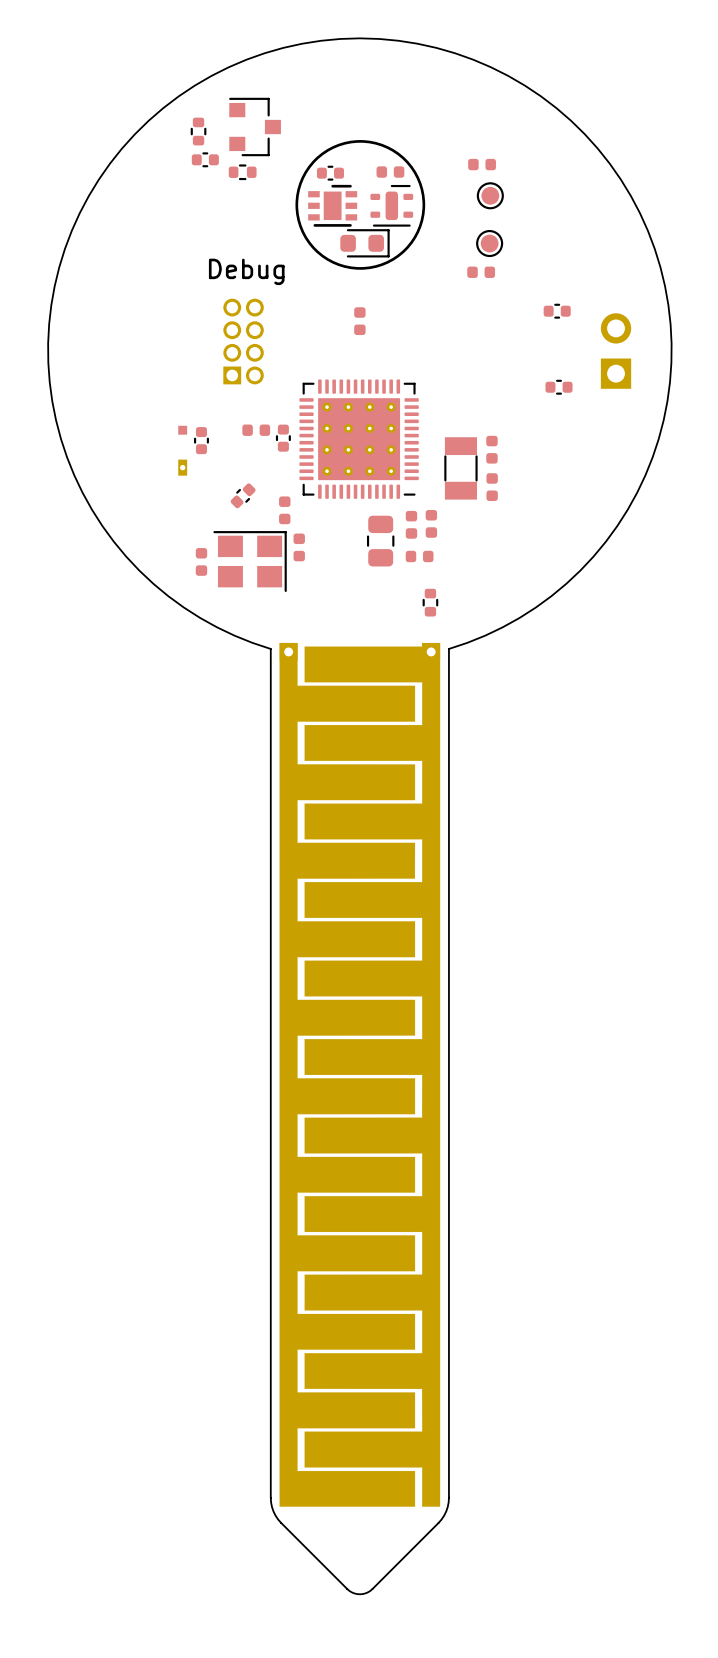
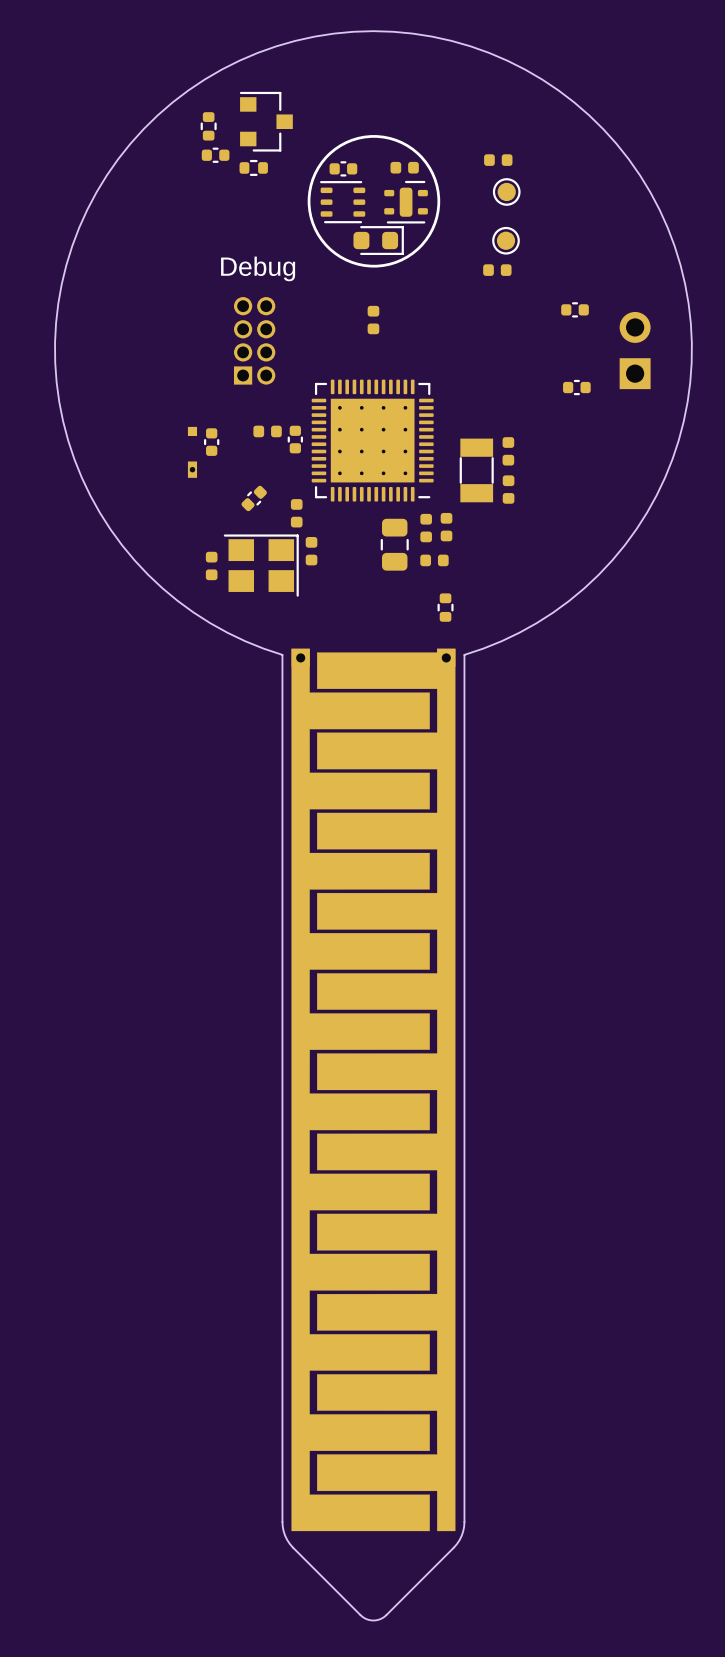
part footprint: [308, 184, 358, 227] -> [320, 181, 366, 224]

